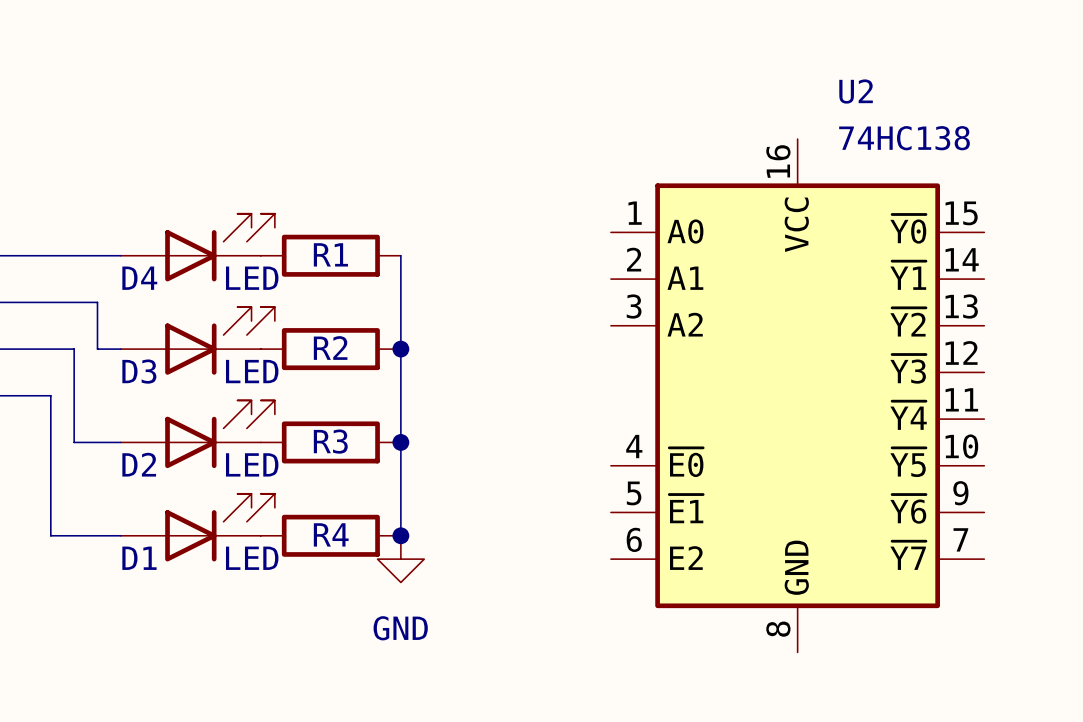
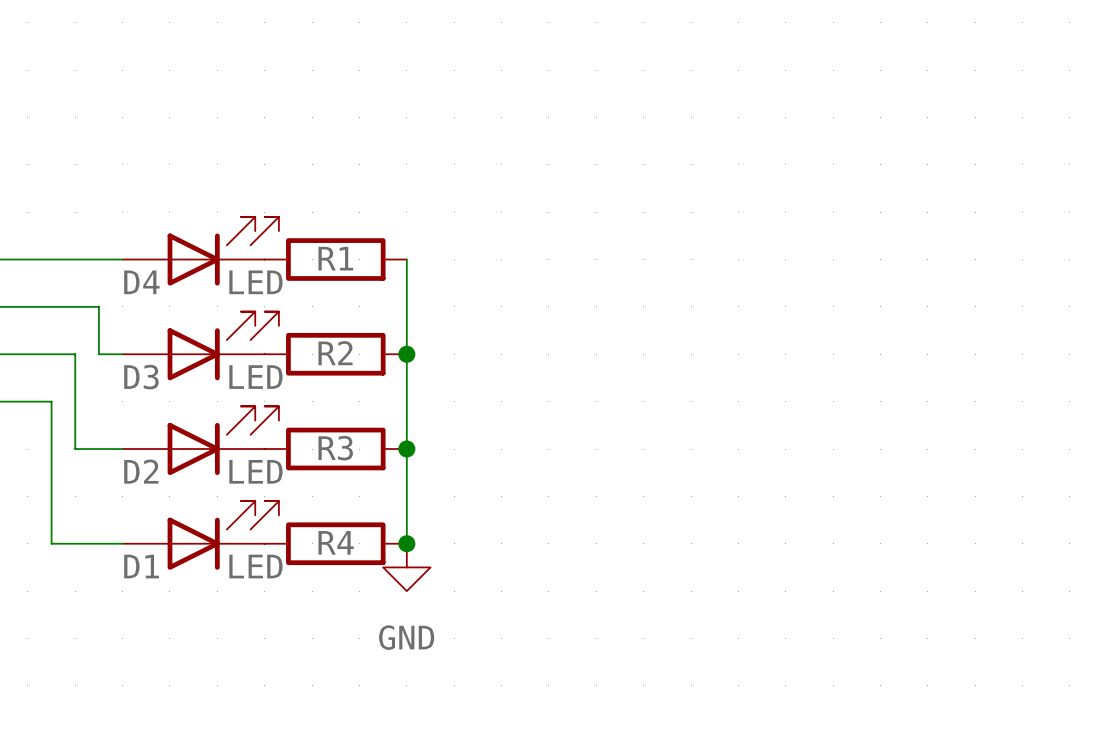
U2: 74HC138 (797, 395) -> none

